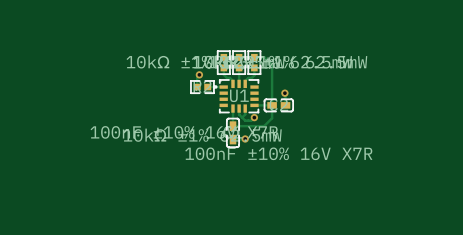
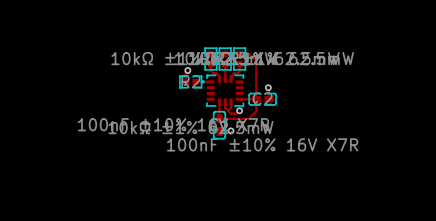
U1 name: U1 (239, 95) -> none

